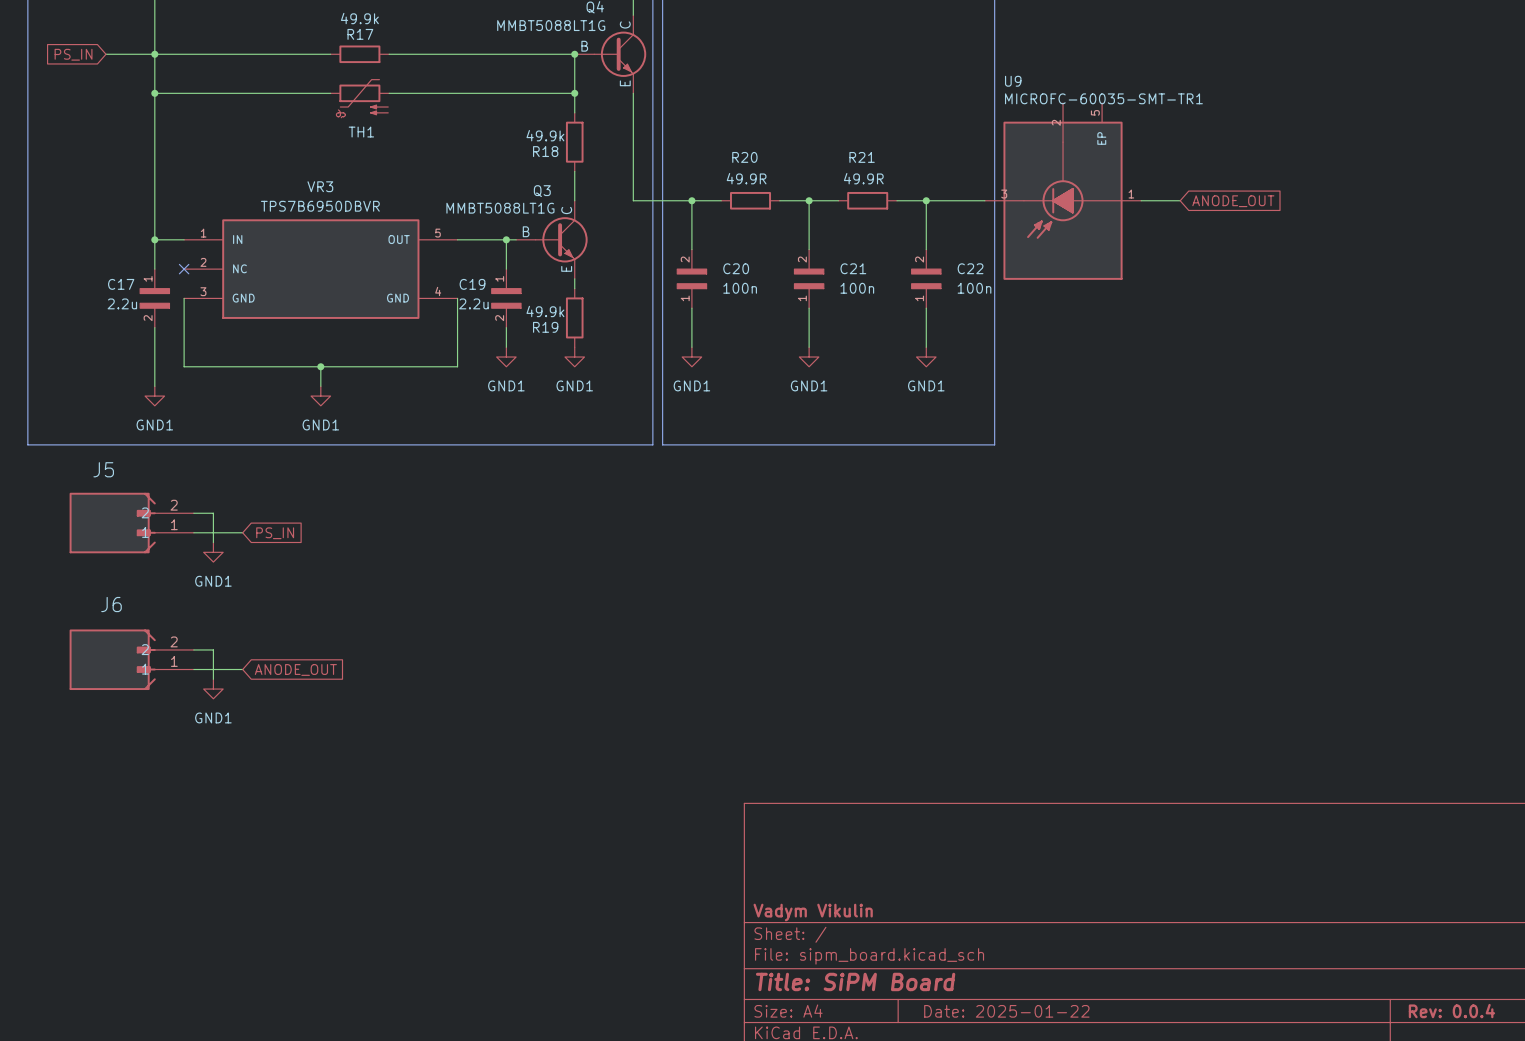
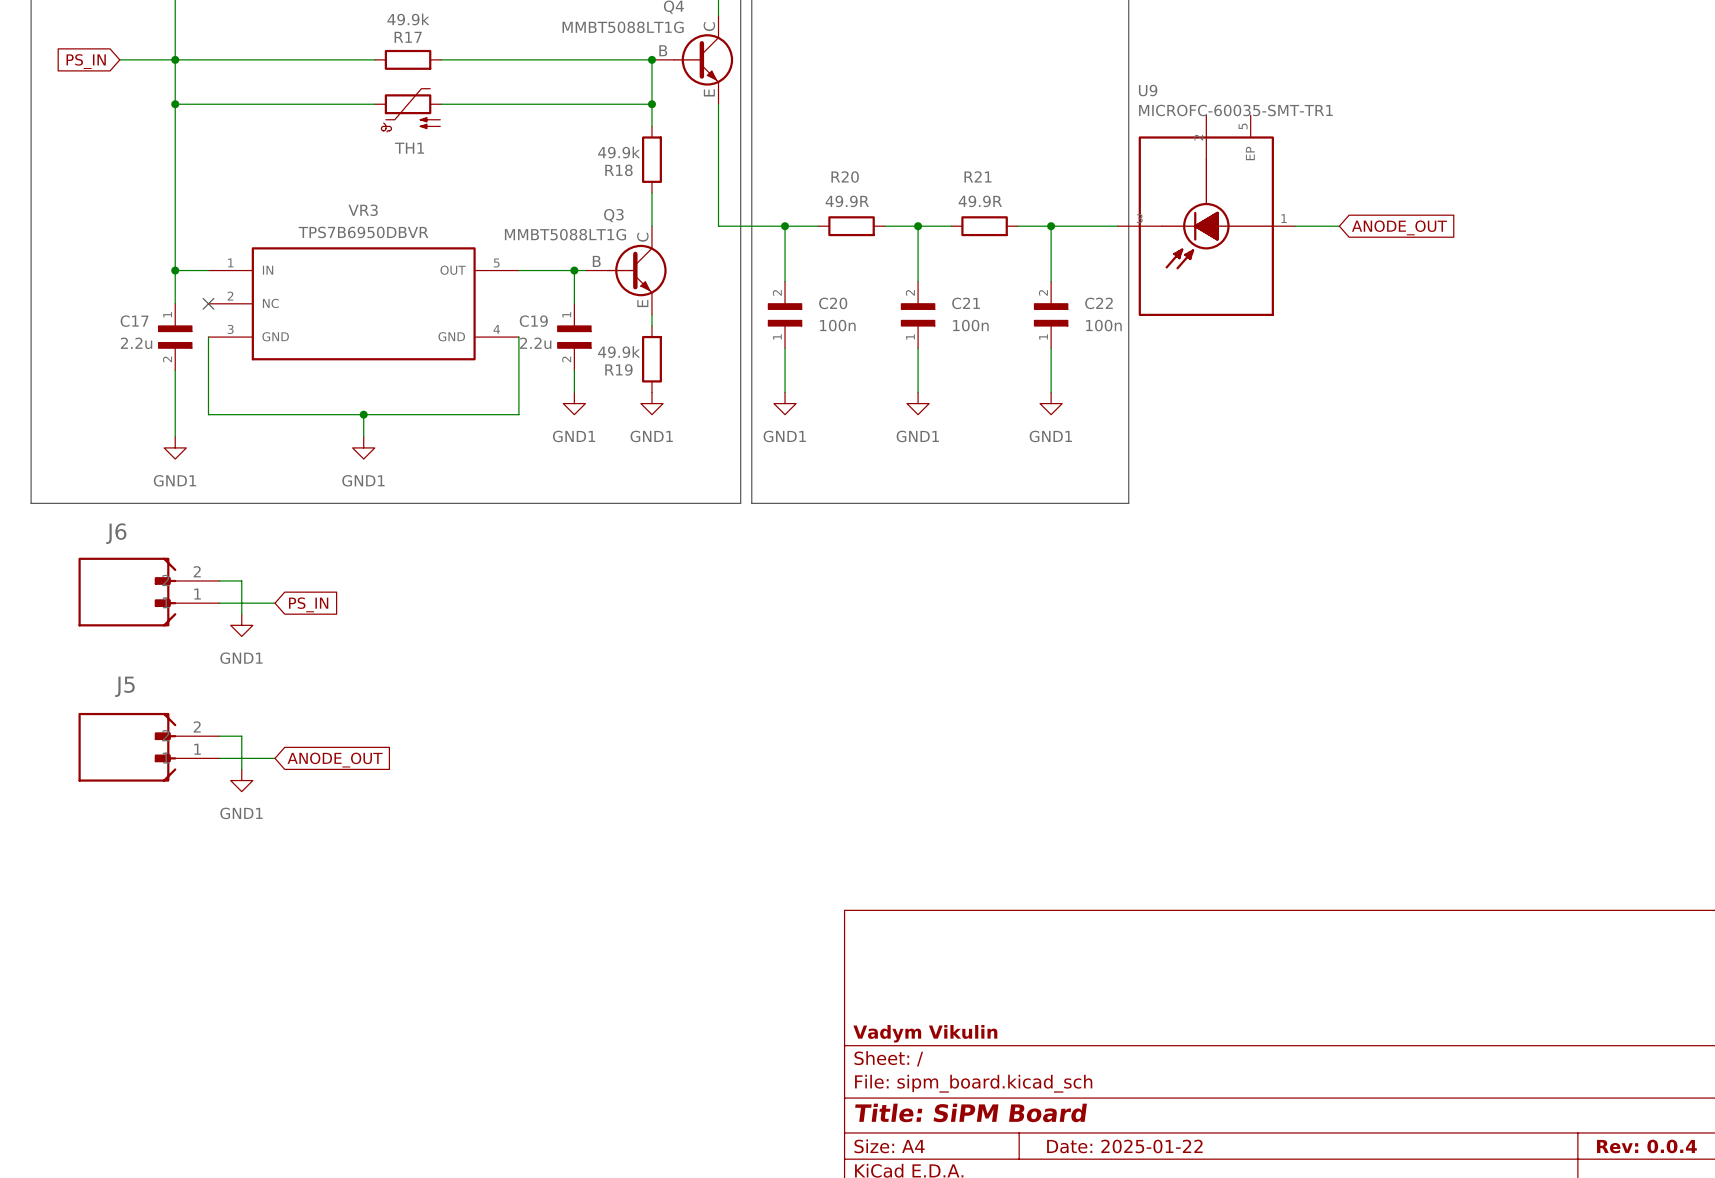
J5 name: J5 (103, 469) -> J6 (116, 533)
J6 name: J6 (111, 604) -> J5 (124, 686)

